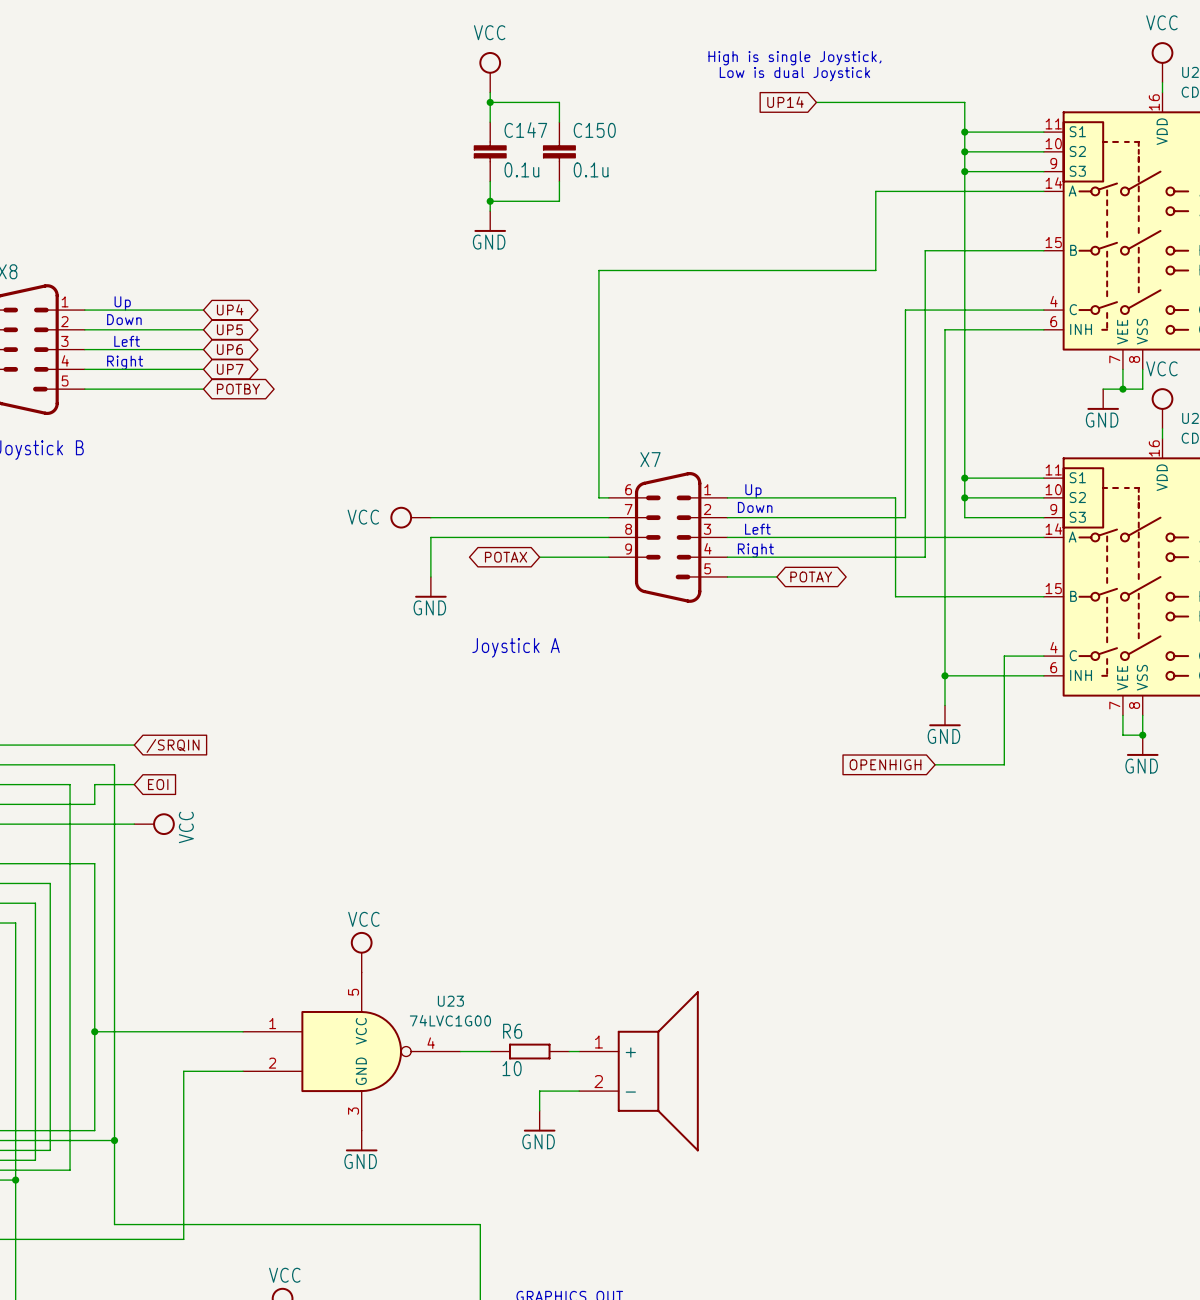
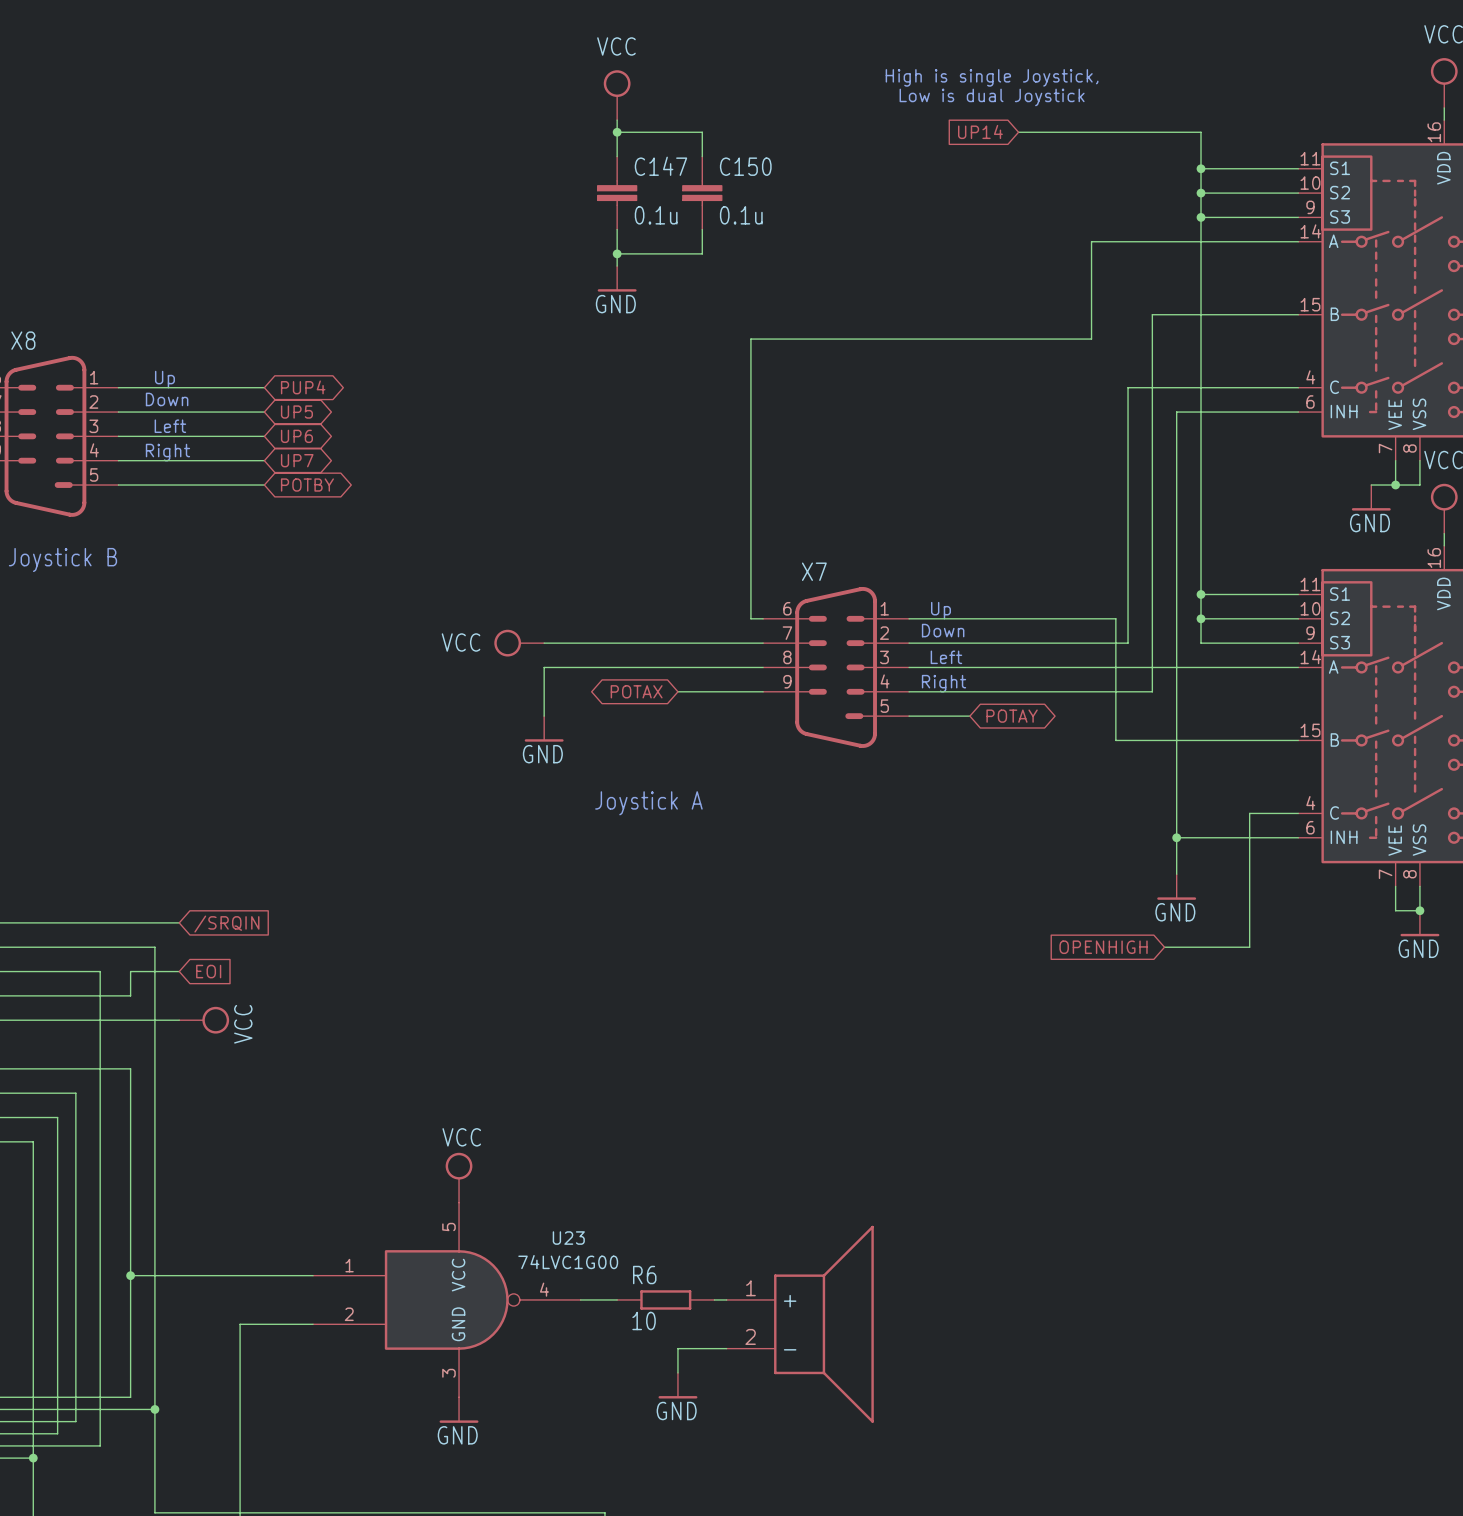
global label: UP4 (230, 309) -> PUP4 (303, 387)

